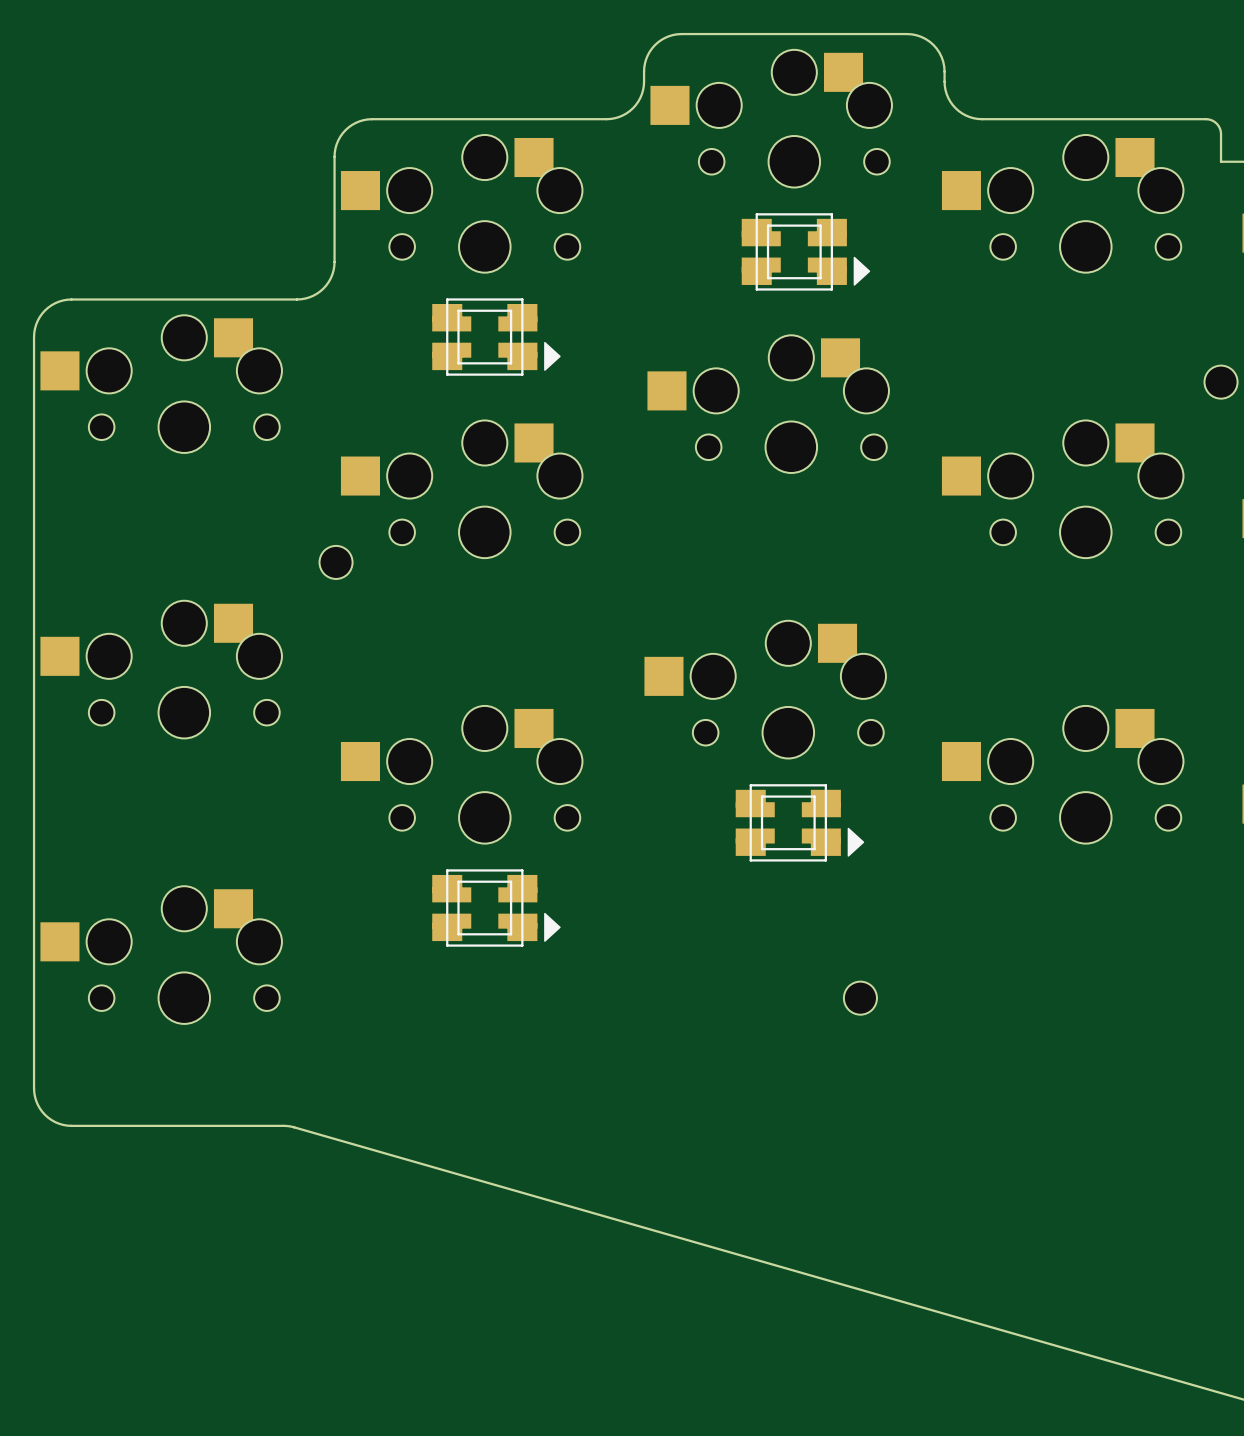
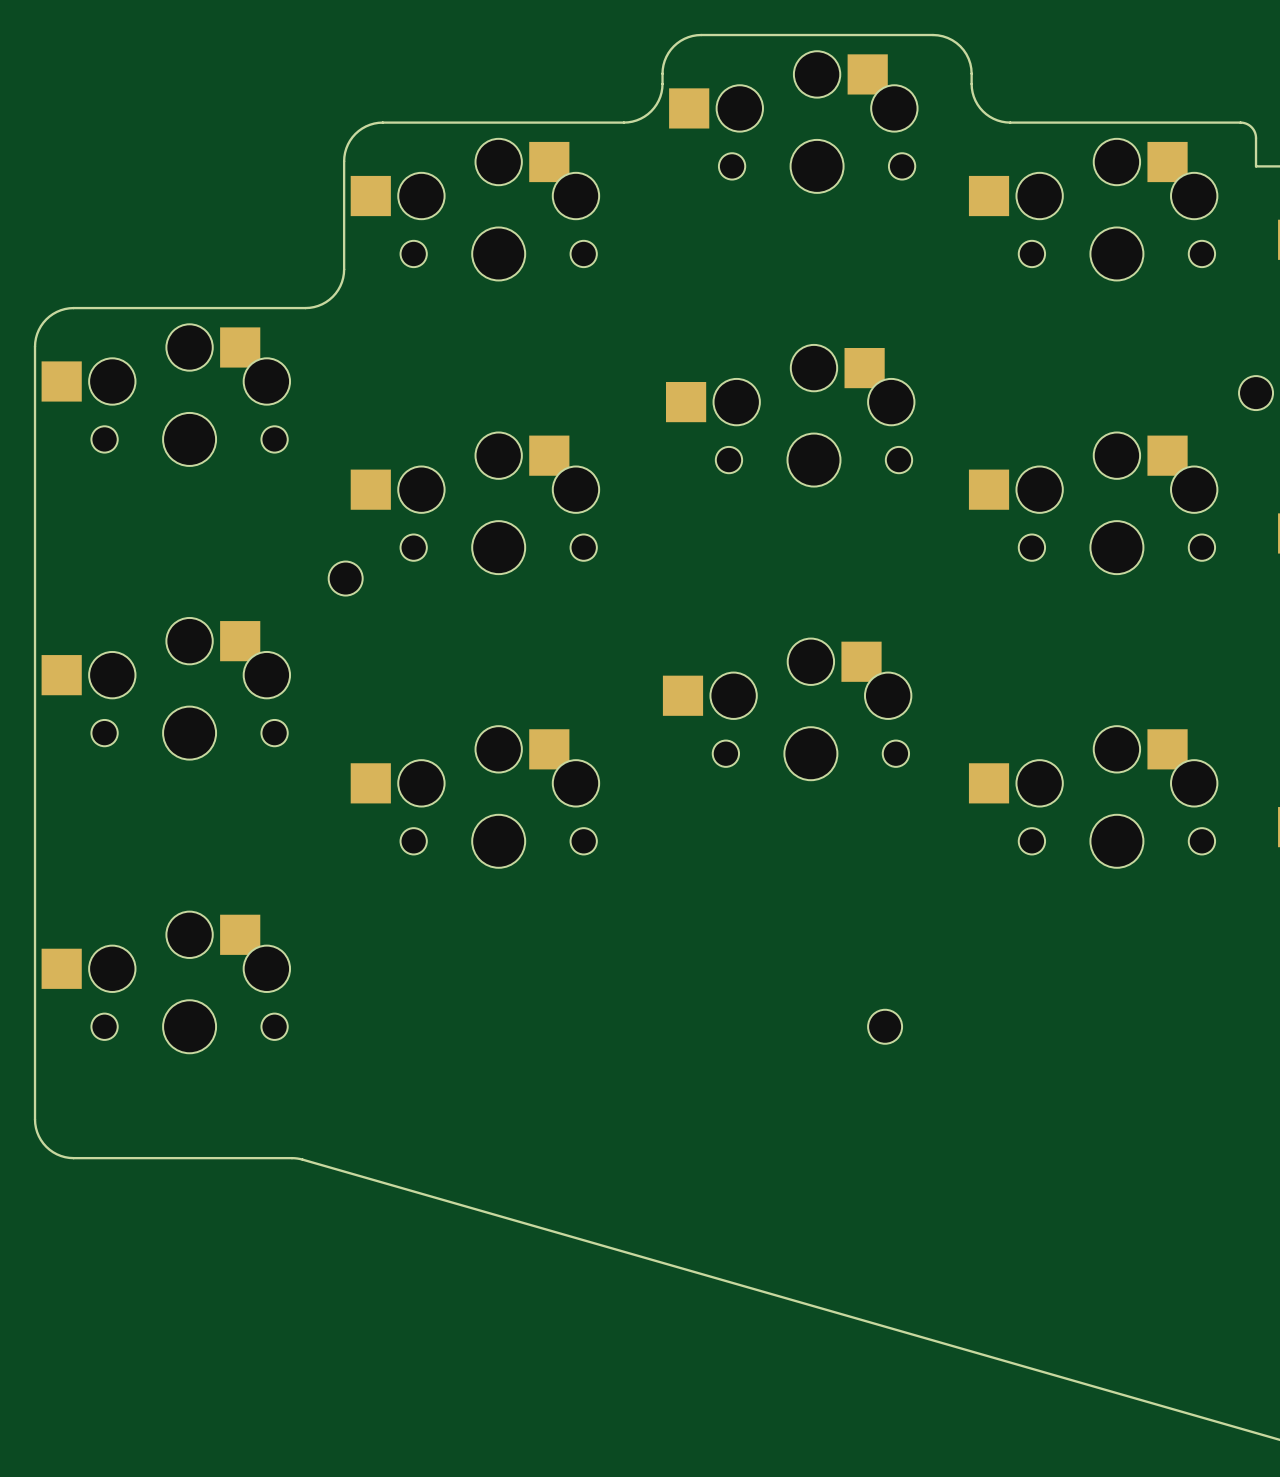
part: (805, 251) -> none
part: (496, 337) -> none
part: (799, 822) -> none
part: (496, 908) -> none

